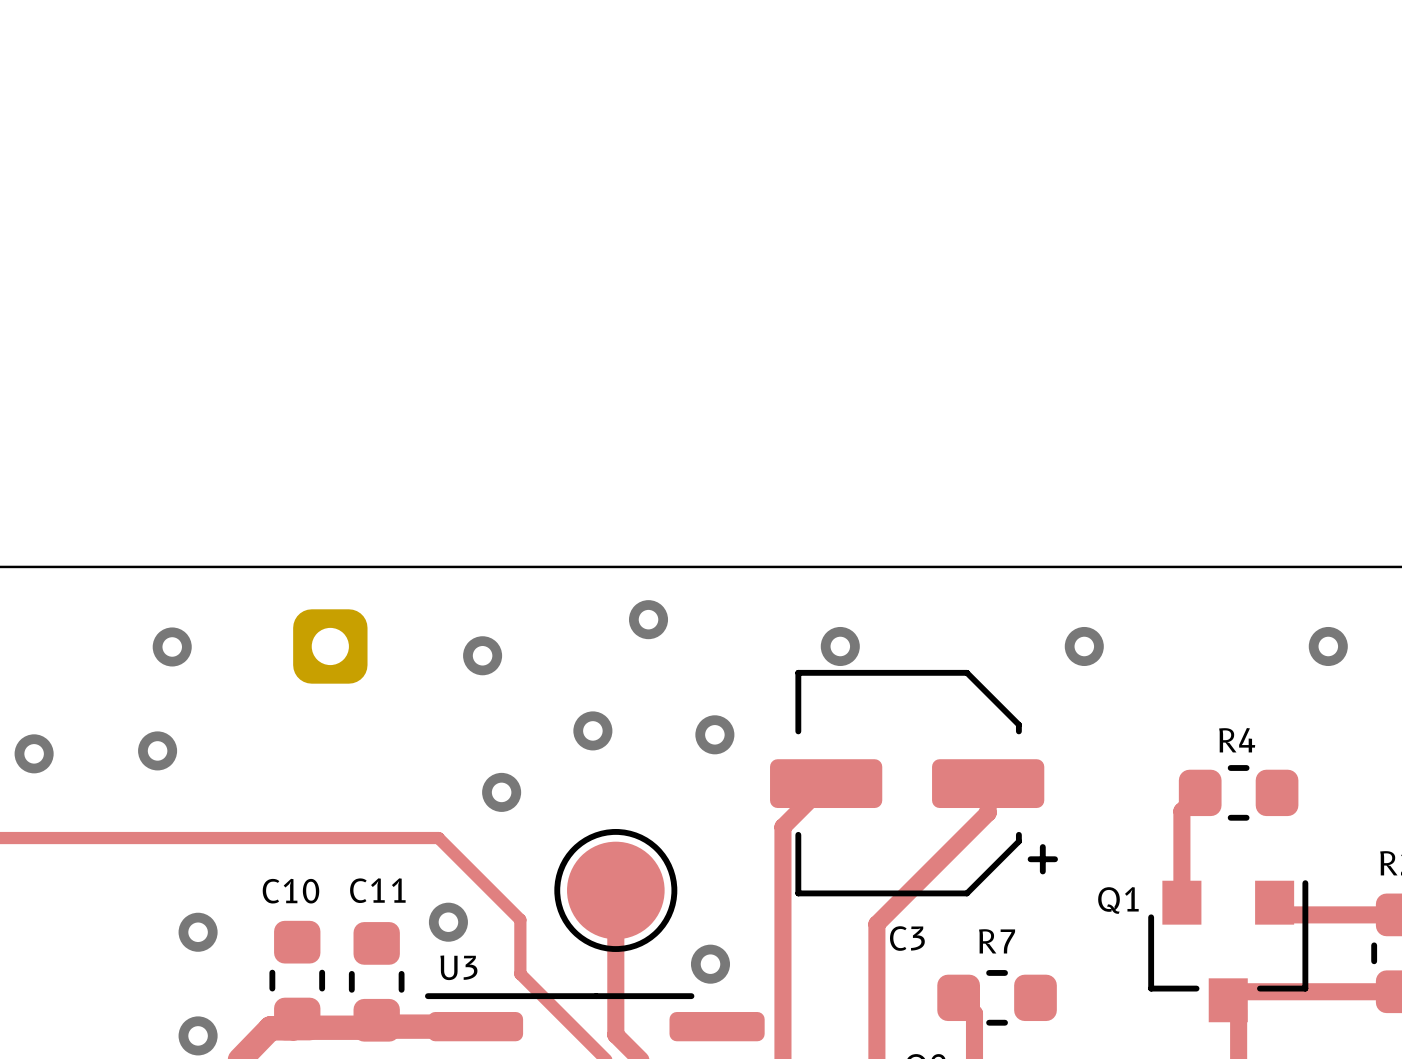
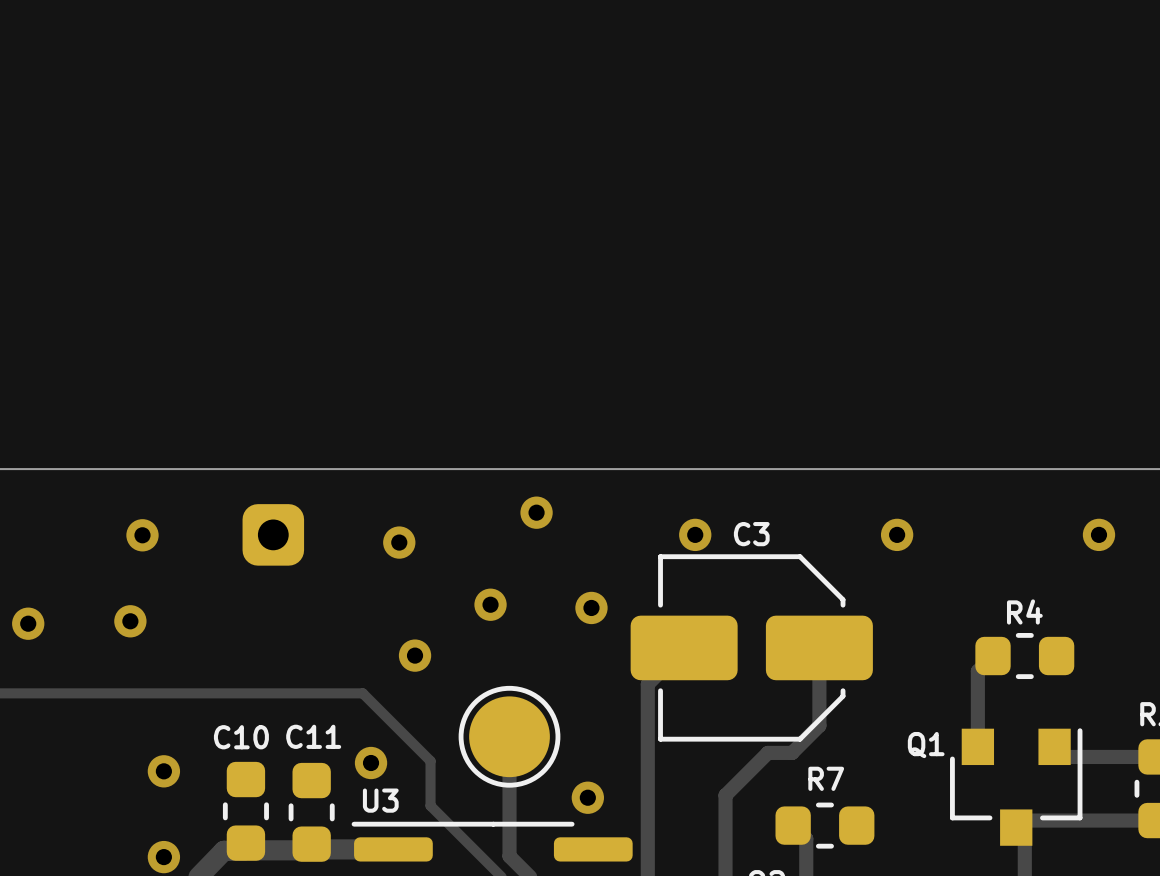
C3 footprint: [770, 669, 1058, 897] -> [630, 554, 873, 742]
track: (988, 783) (988, 812) (876, 924) (876, 961) -> (819, 647) (819, 725) (792, 752) (767, 752) (725, 795)
C3 name position: C3 (907, 938) -> C3 (751, 534)

